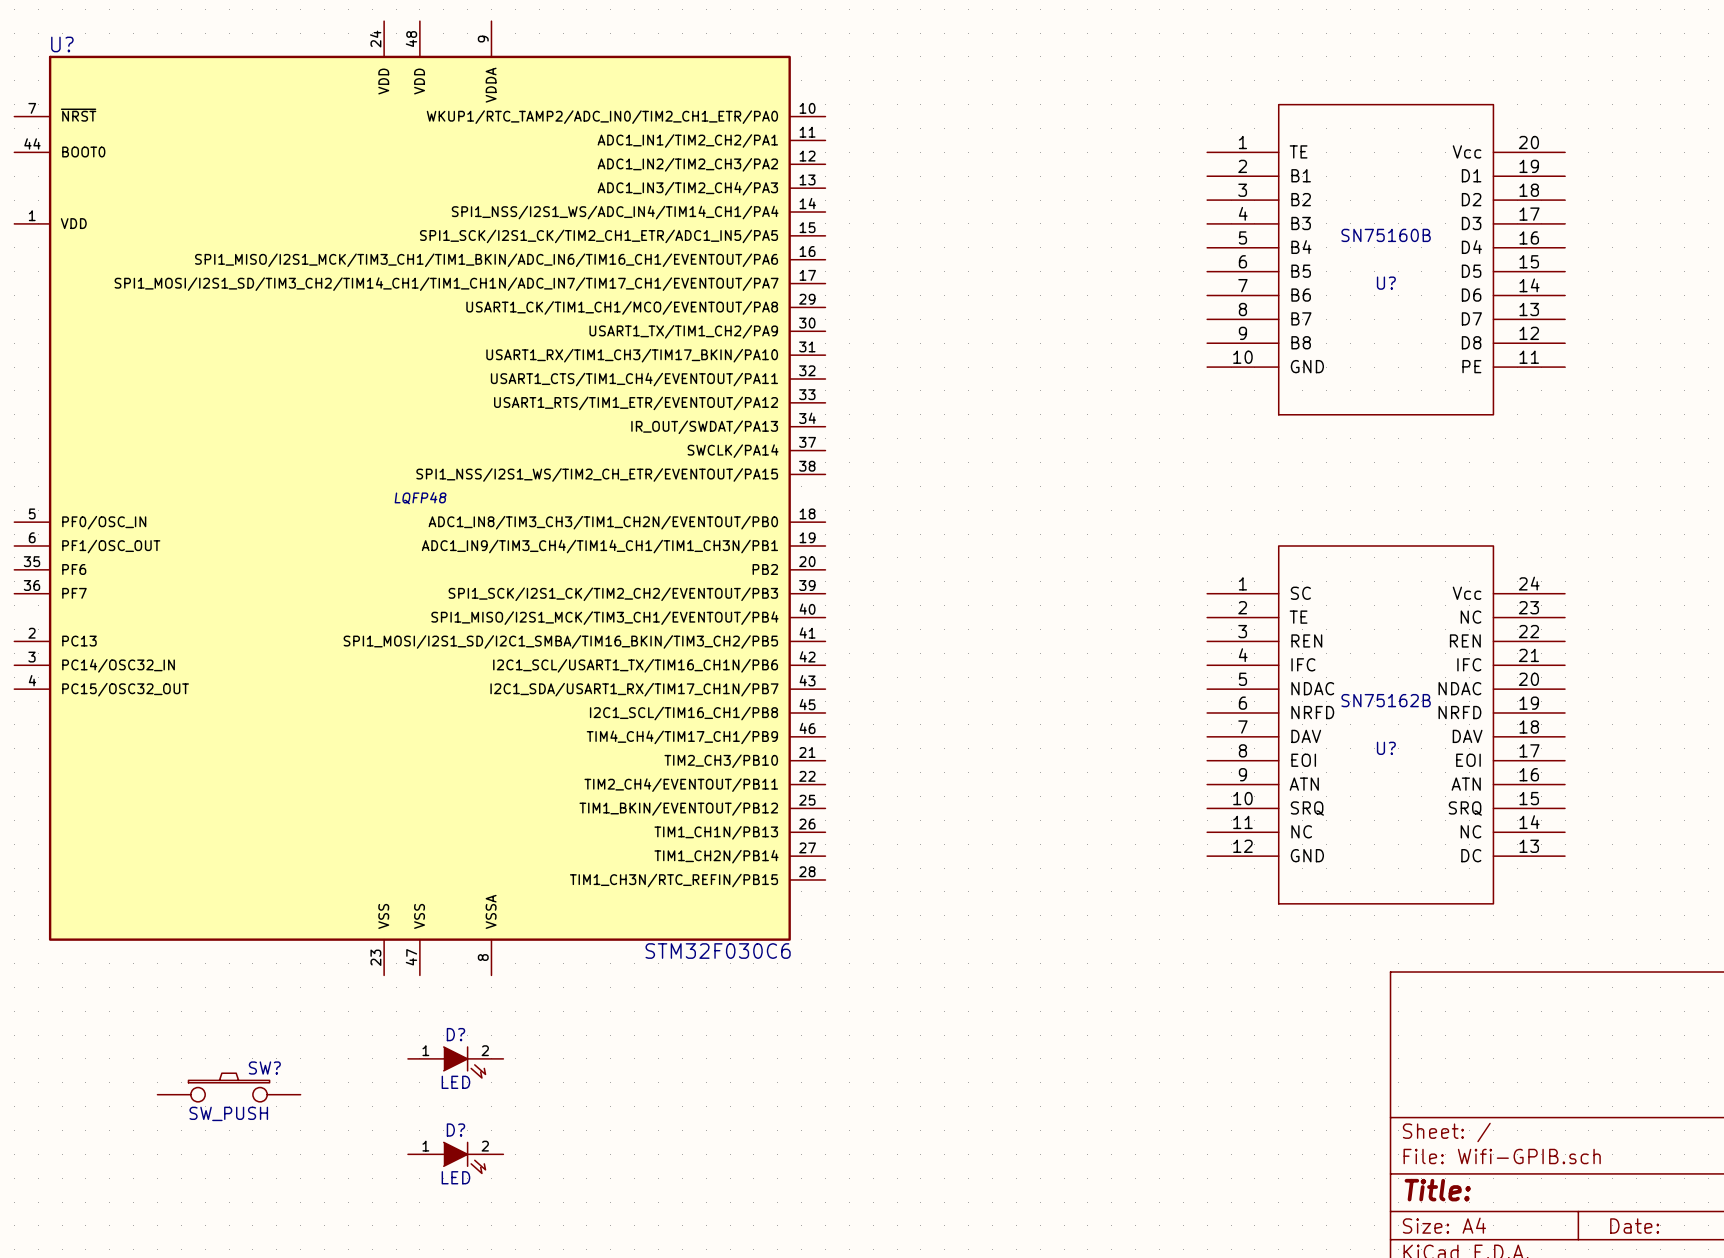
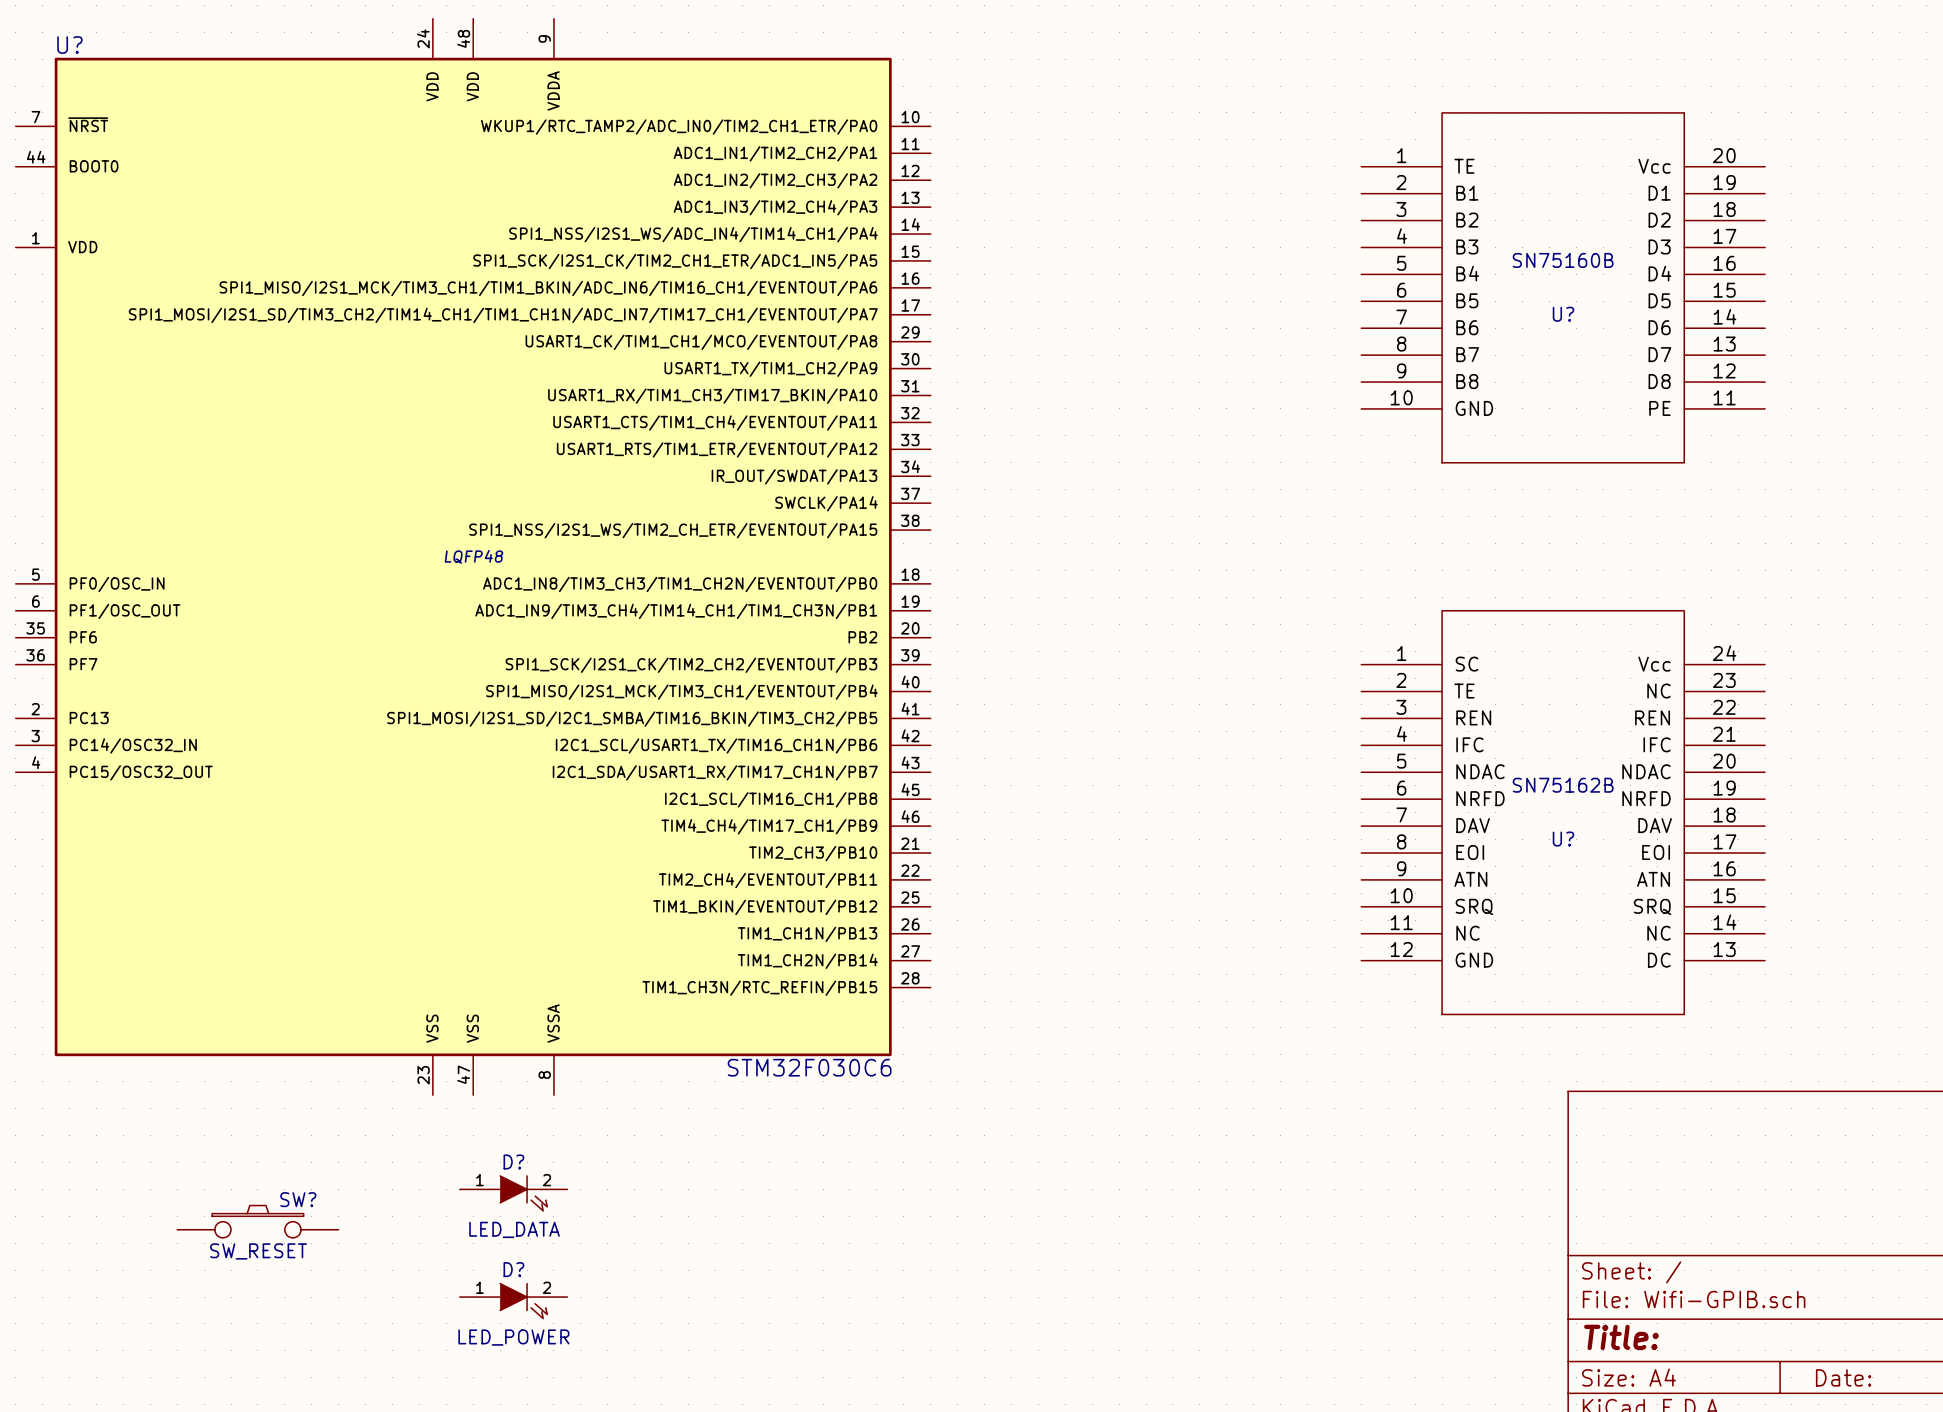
D? value: LED (455, 1082) -> LED_DATA (514, 1229)
SW? value: SW_PUSH (228, 1113) -> SW_RESET (258, 1251)
D? value: LED (455, 1177) -> LED_POWER (513, 1337)

